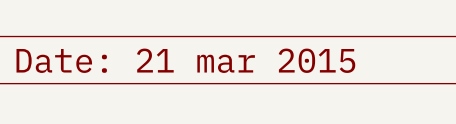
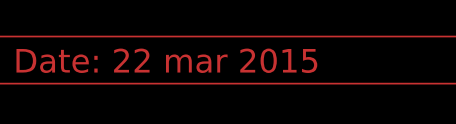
title block: Date: 21 mar 2015 (185, 60) -> Date: 22 mar 2015 (166, 60)

